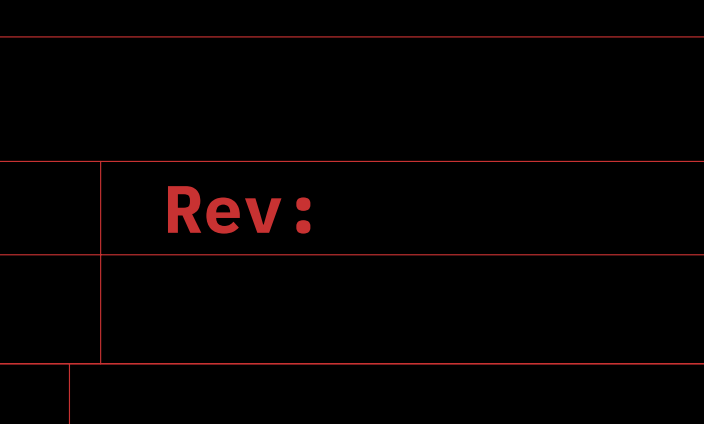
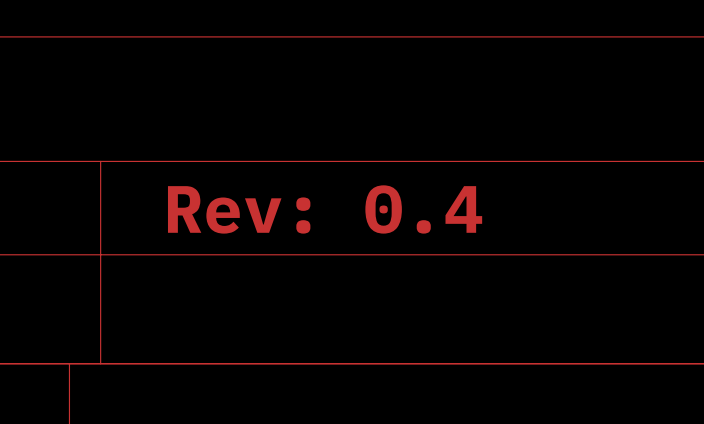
title block: Rev: (239, 209) -> Rev: 0.4 (325, 209)

